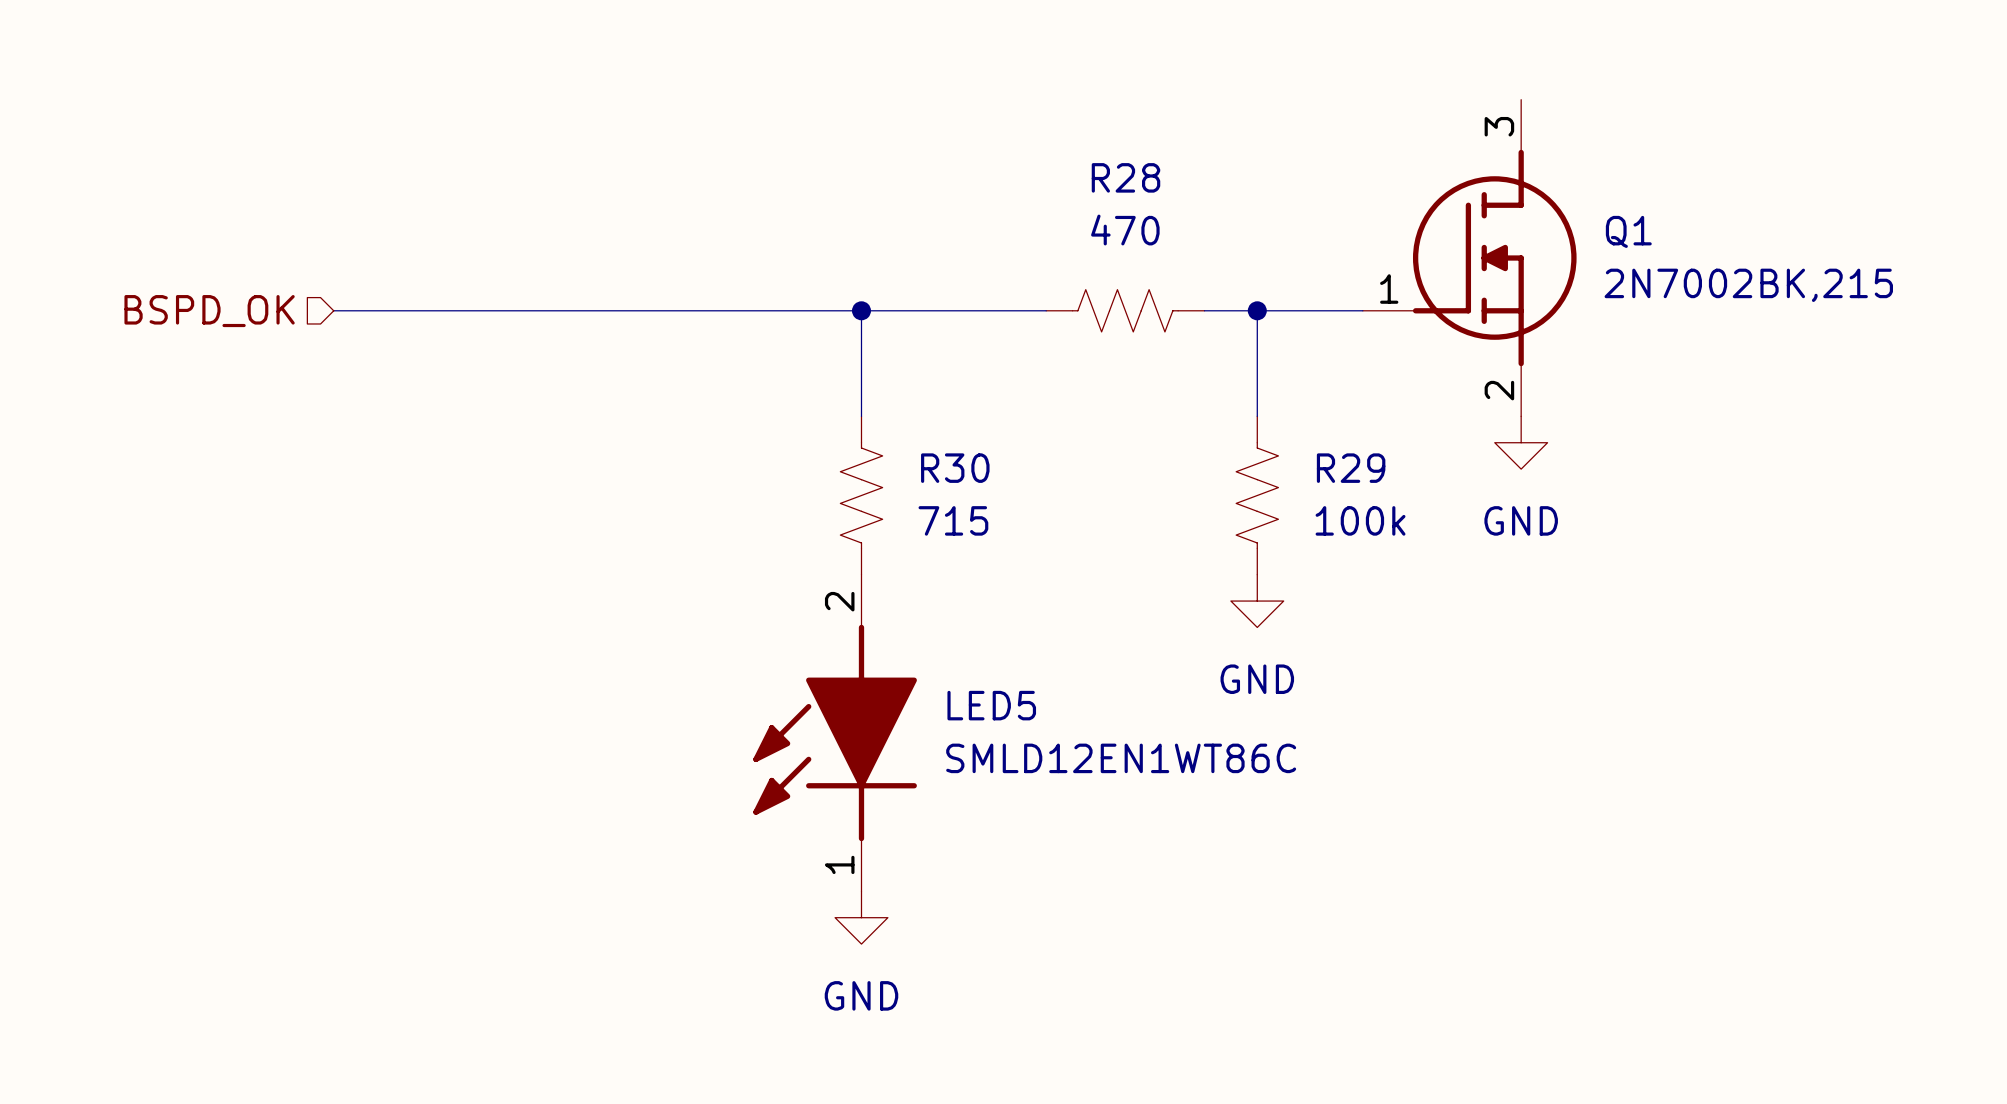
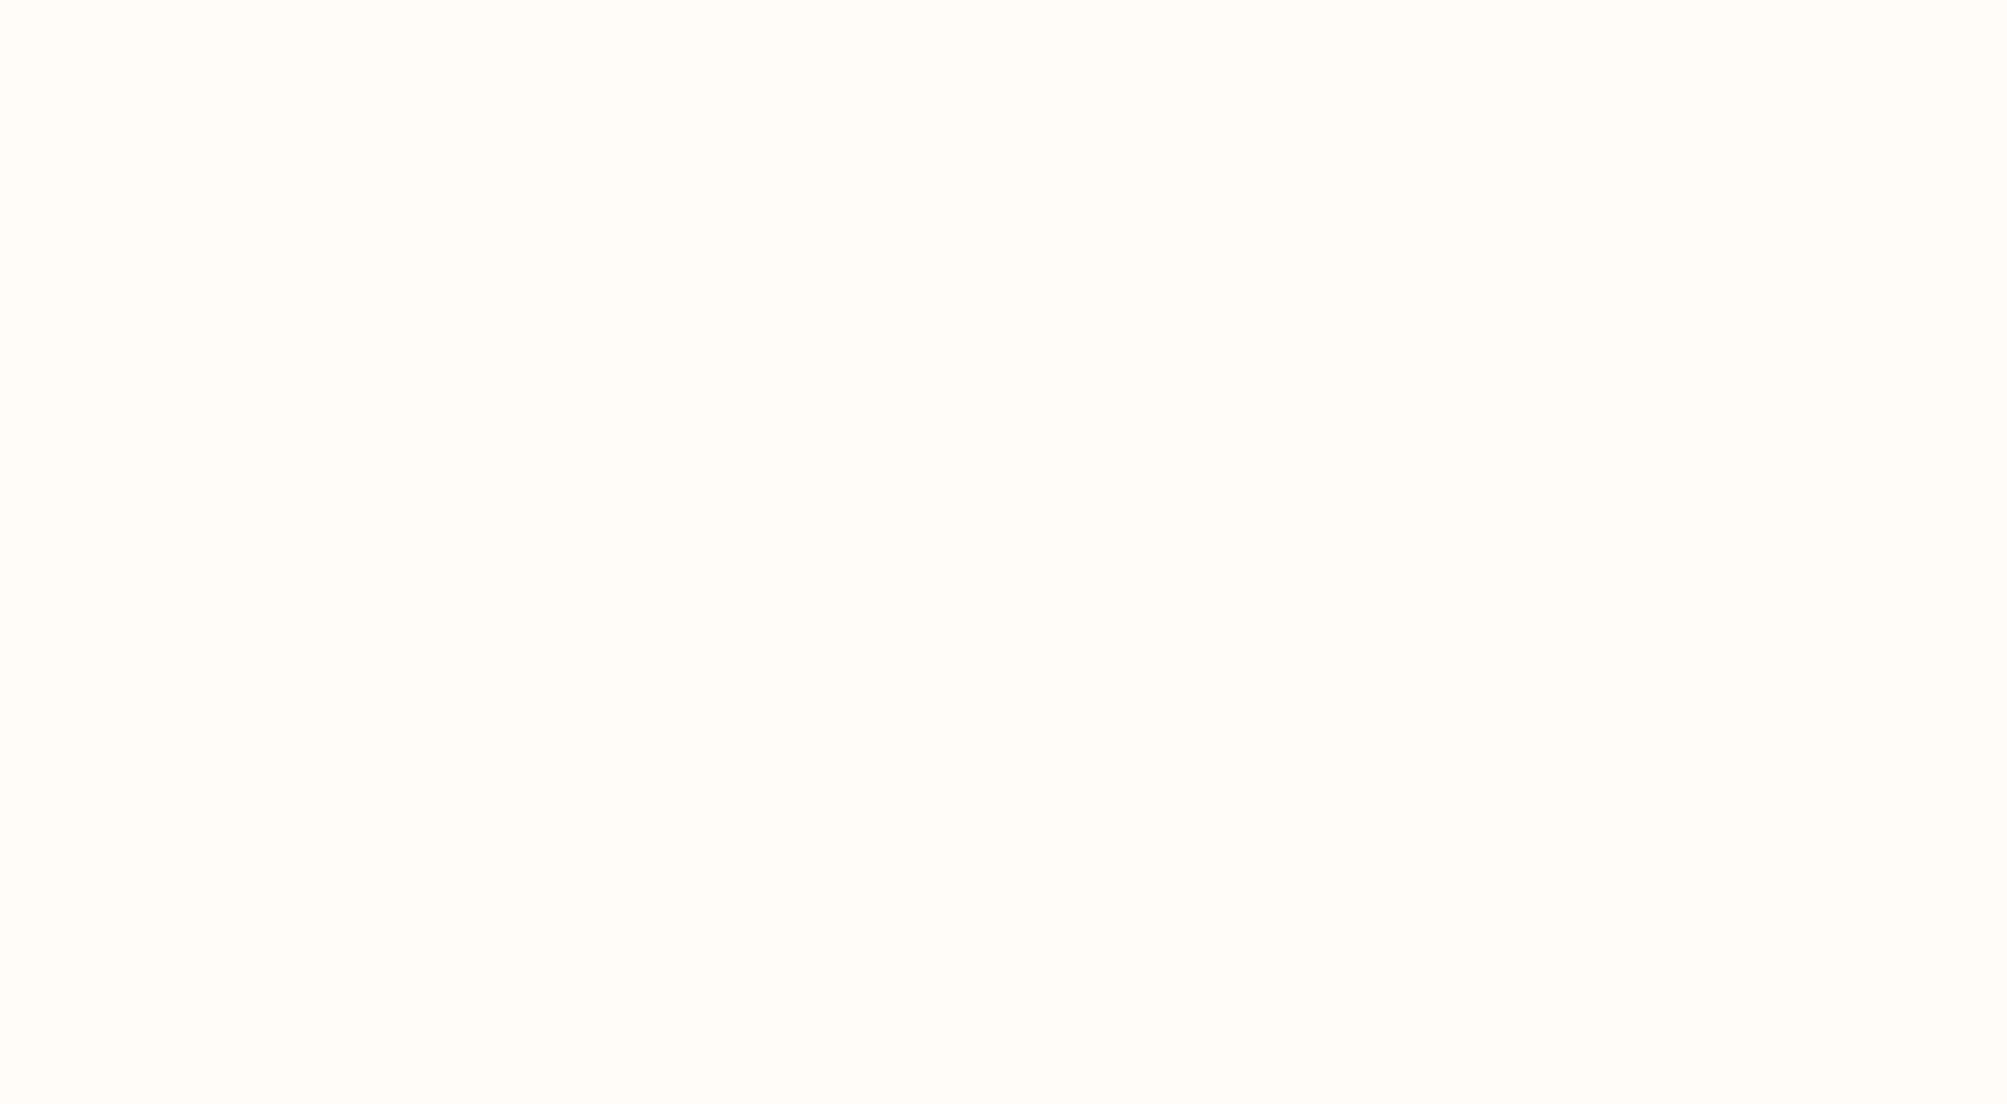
Q1: 2N7002BK,215 (1469, 258) -> none
wire: (333, 310) (1046, 310) -> none
wire: (861, 310) (861, 416) -> none
junction: (861, 310) -> none
R28: 470 (1125, 310) -> none
wire: (1204, 310) (1362, 310) -> none
wire: (1257, 310) (1257, 416) -> none
junction: (1257, 310) -> none
hierarchical label: BSPD_OK (209, 311) -> none
power symbol: GND (1521, 442) -> none
R30: 715 (861, 495) -> none
R29: 100k (1257, 495) -> none
power symbol: GND (1257, 601) -> none
LED5: SMLD12EN1WT86C (835, 732) -> none
power symbol: GND (861, 917) -> none

